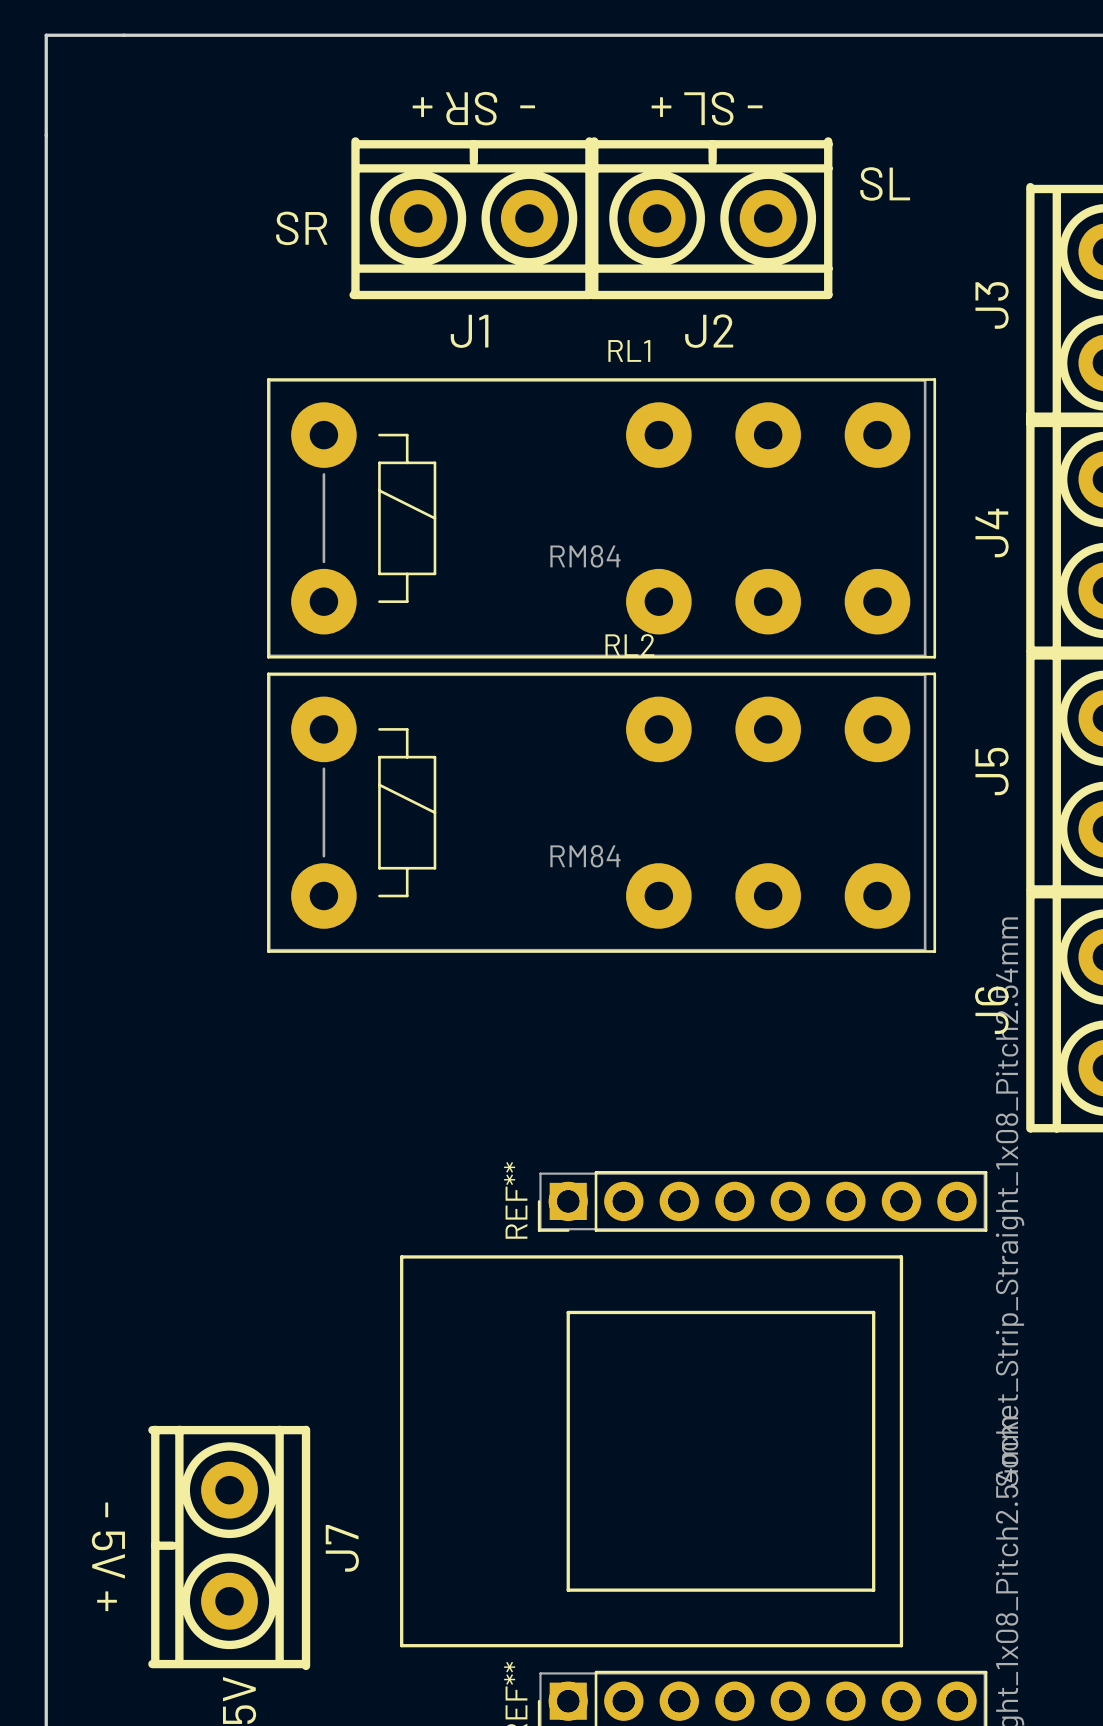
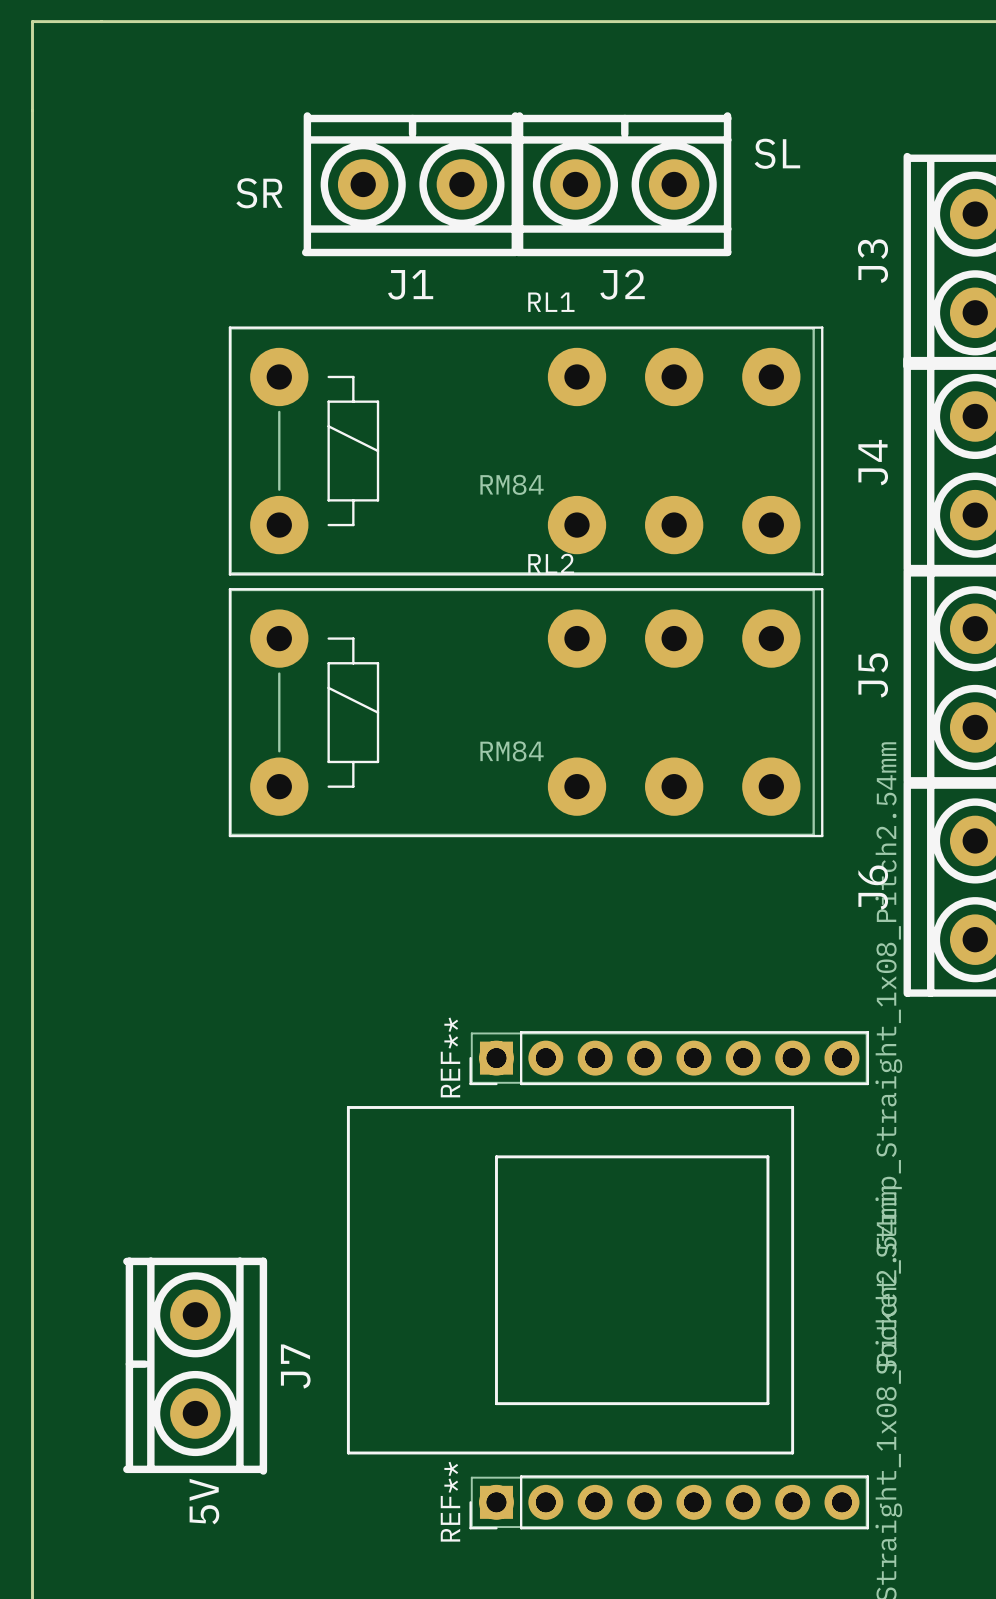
text: - SR + (473, 108) -> none
text: - SL + (707, 108) -> none
text: - 5V + (108, 1556) -> none

